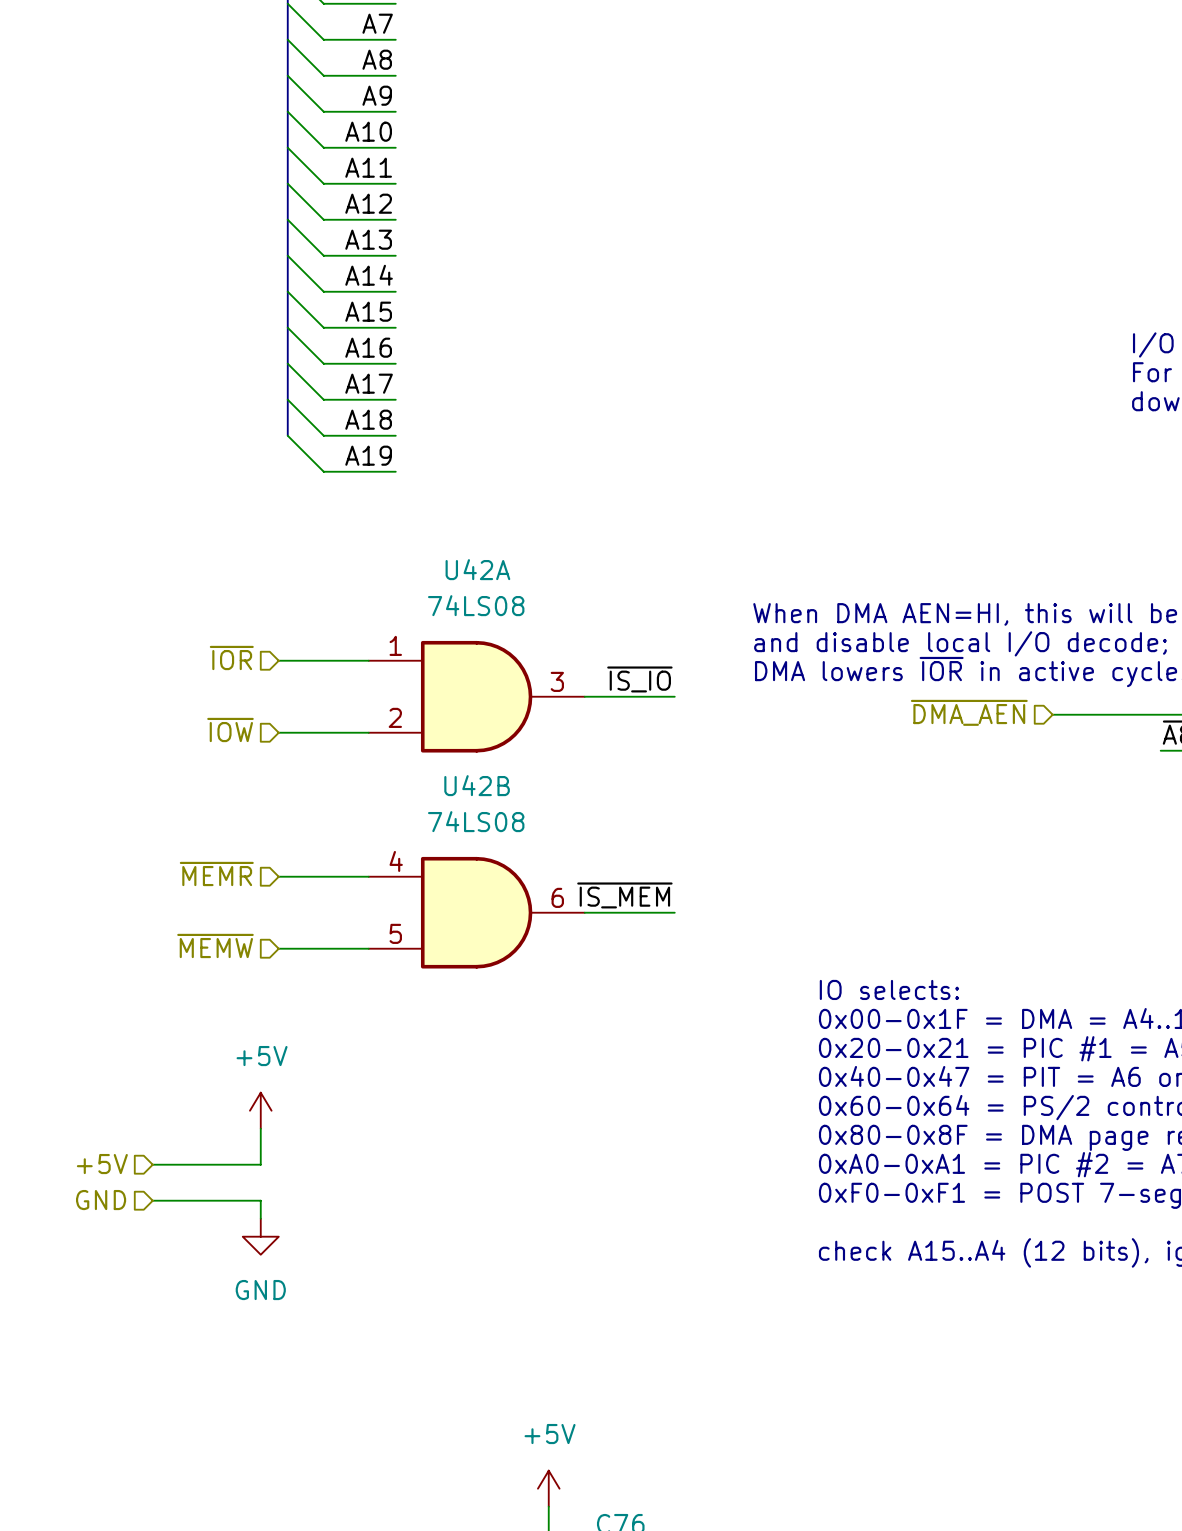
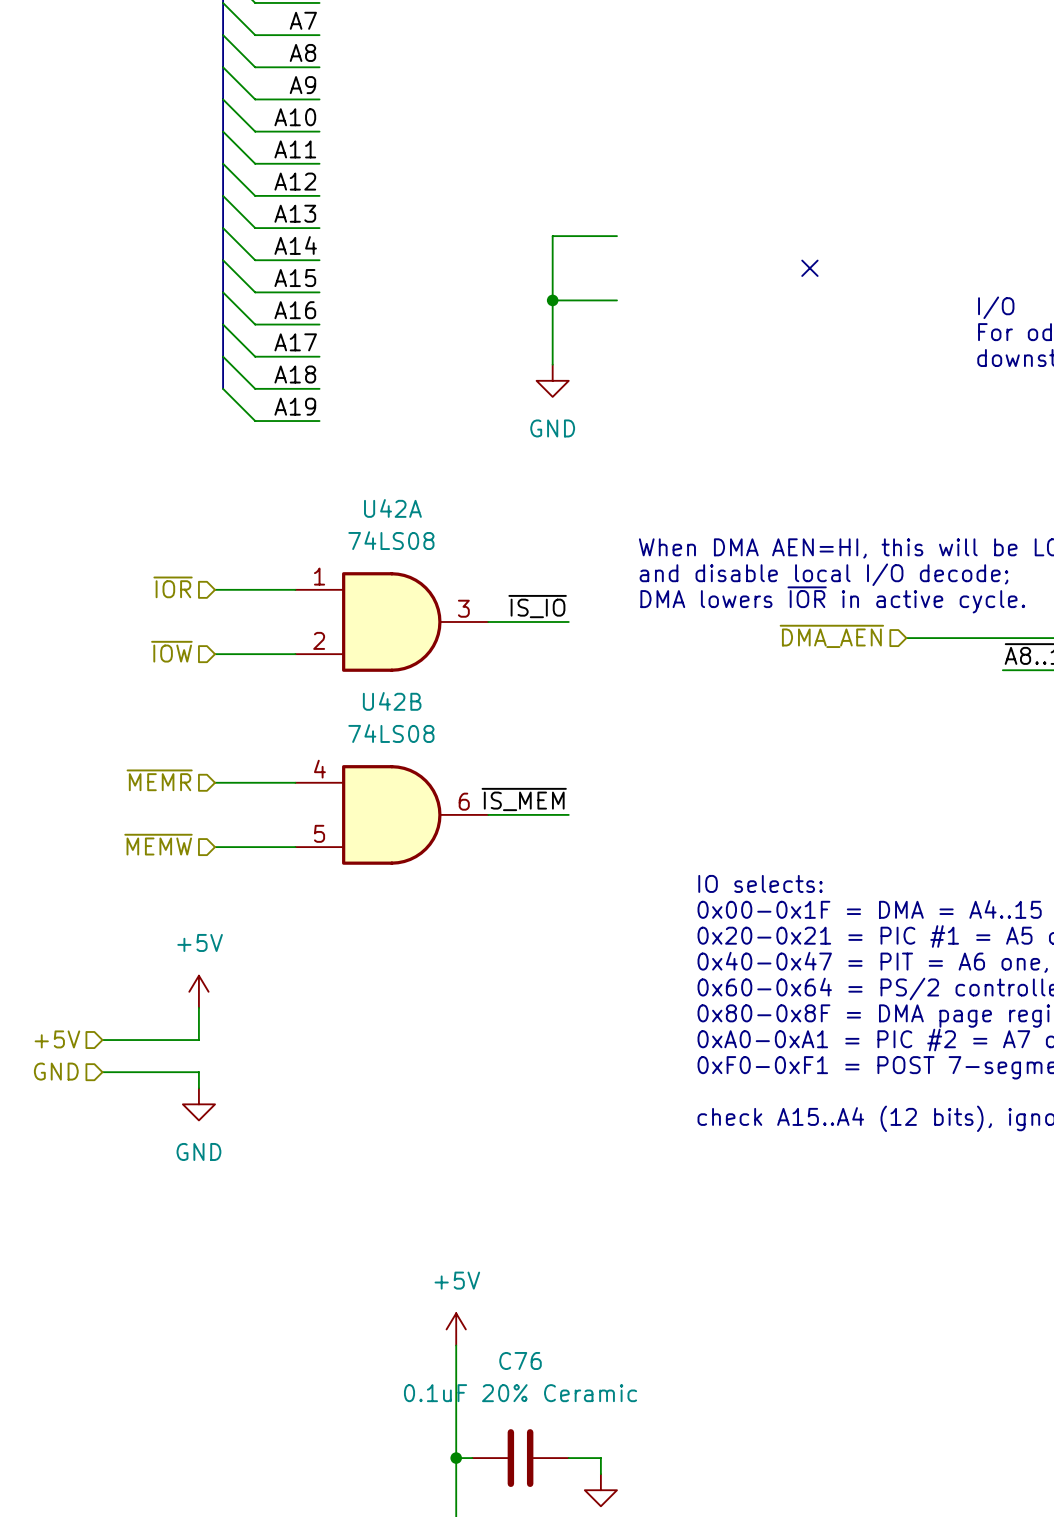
wire: none -> (616, 236) (552, 236) (552, 364)
no-connect mark: none -> (809, 268)
wire: none -> (552, 300) (616, 300)
junction: none -> (552, 300)
power symbol: none -> GND (552, 380)

